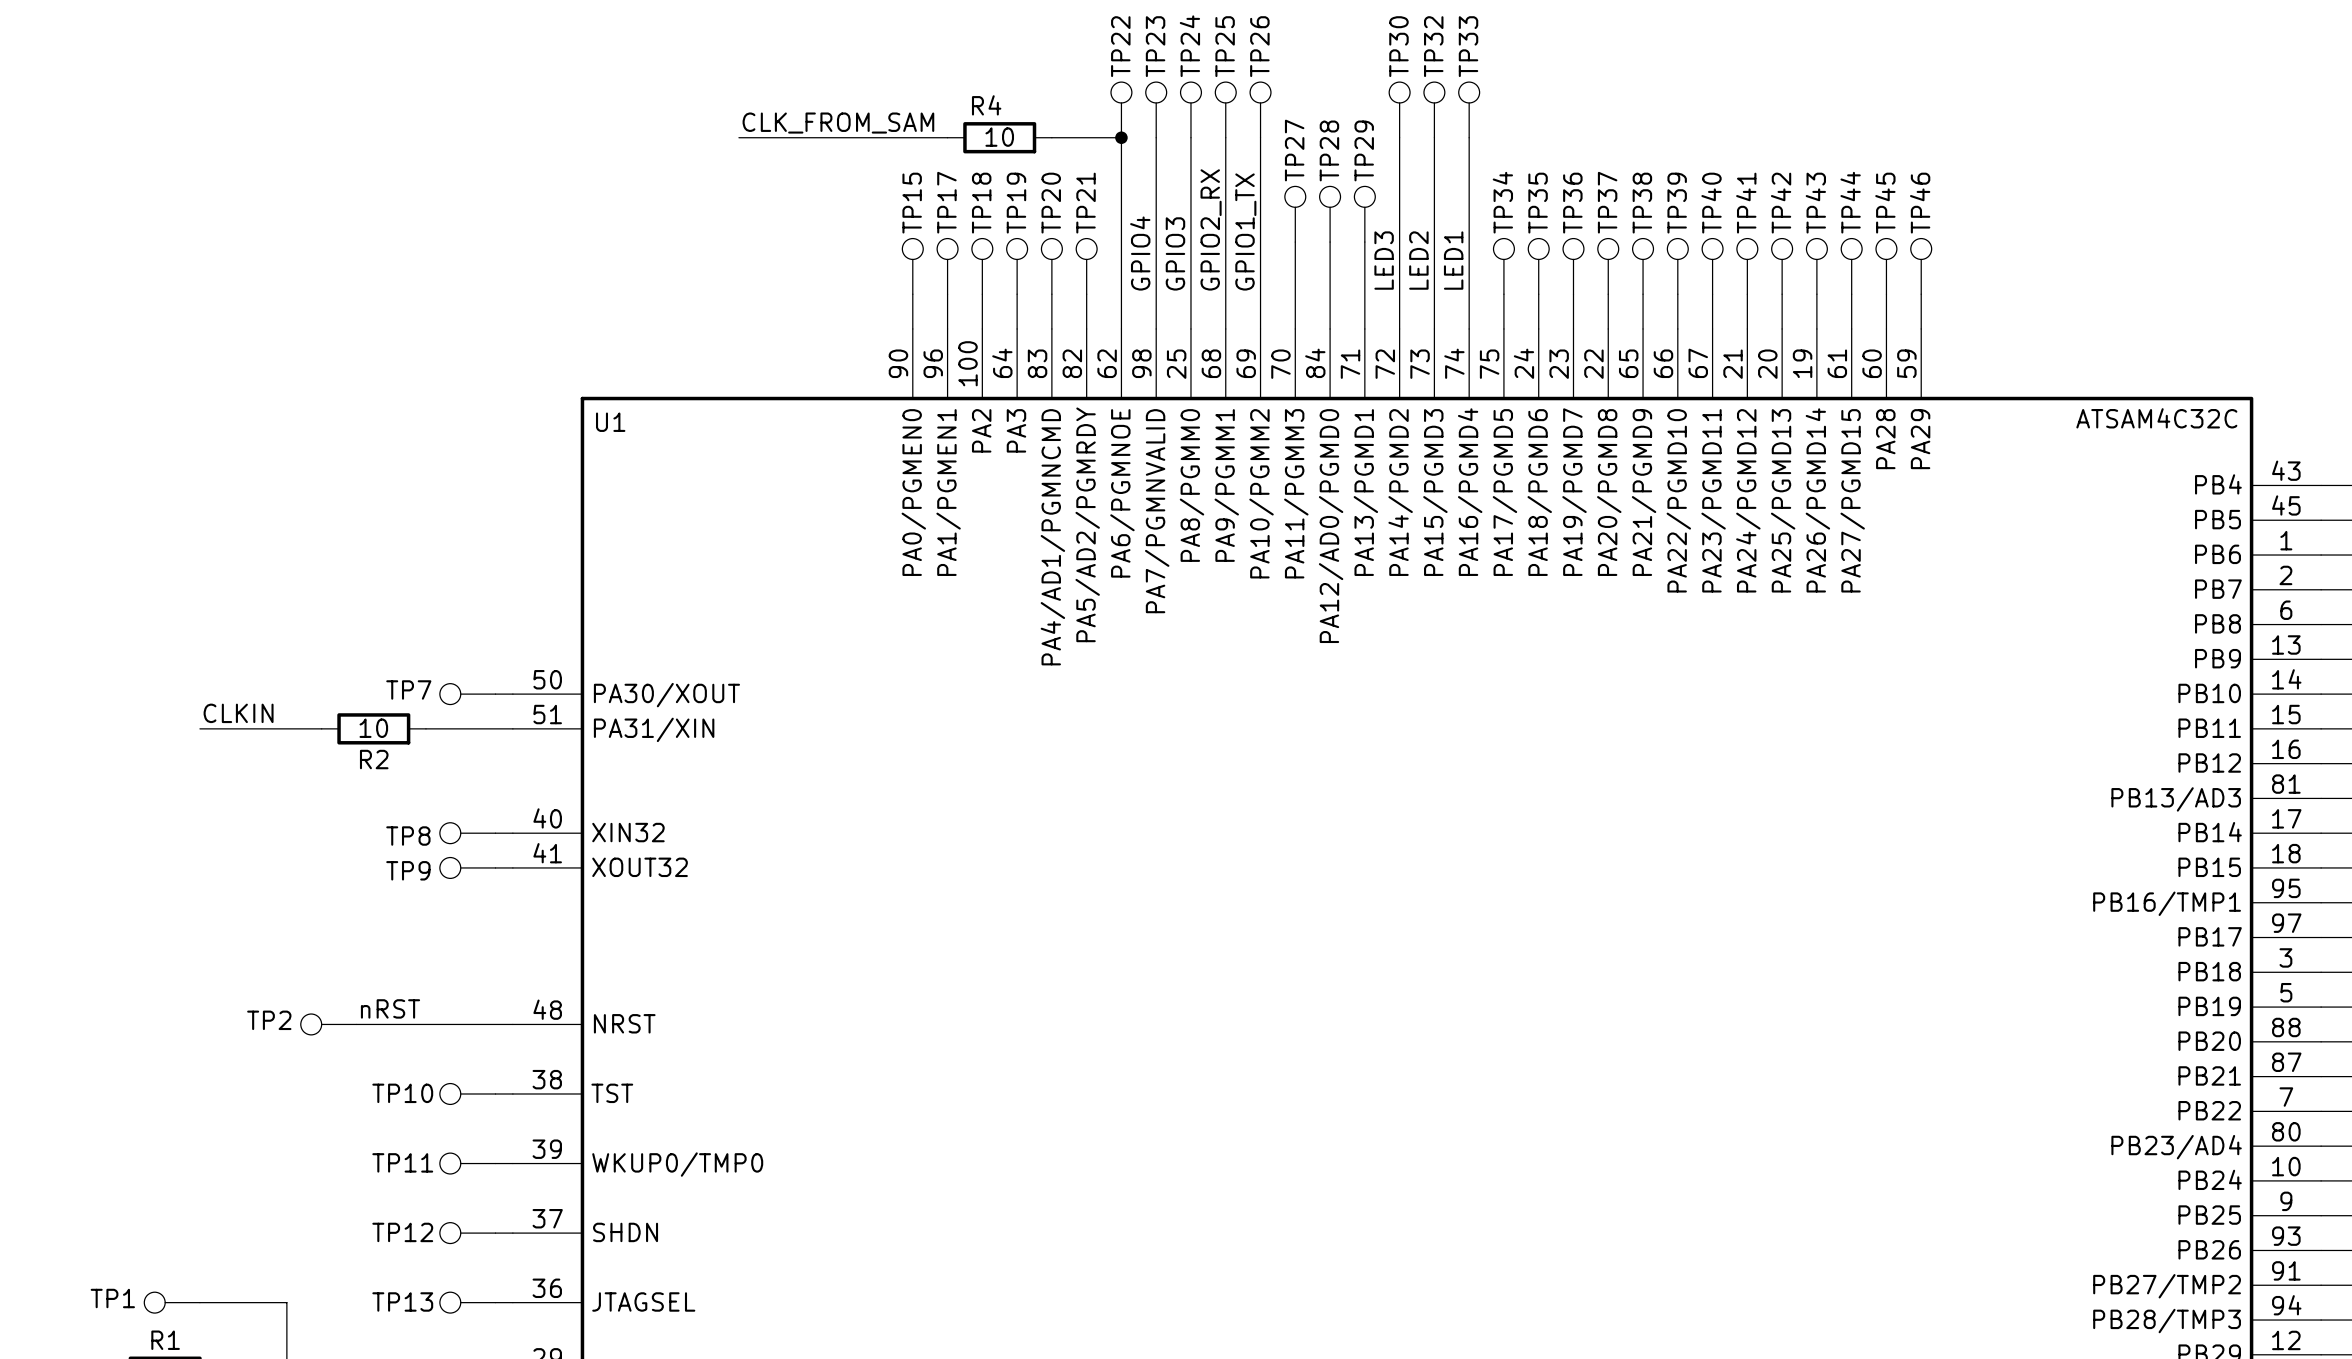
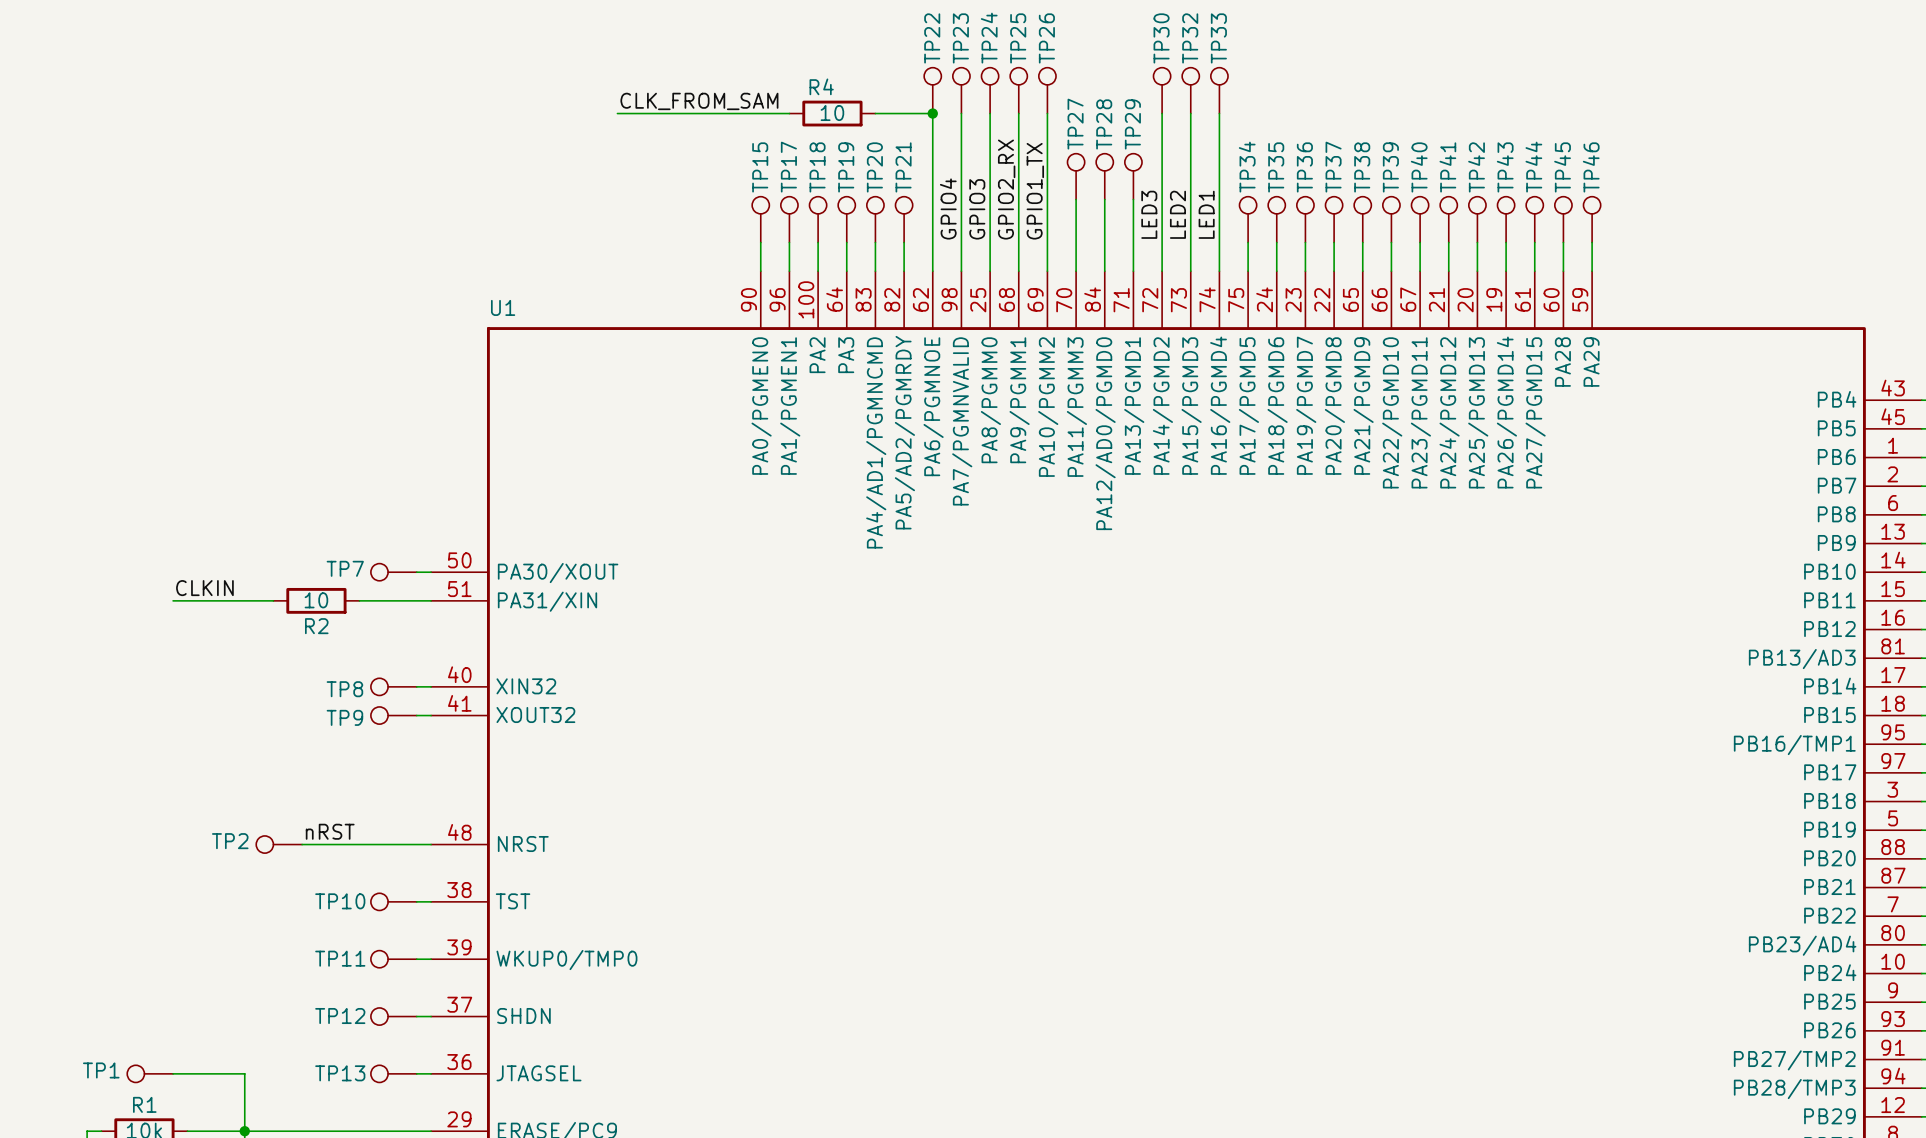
U1 value: ATSAM4C32C (2156, 418) -> none
U1 name position: U1 (610, 422) -> U1 (503, 307)

